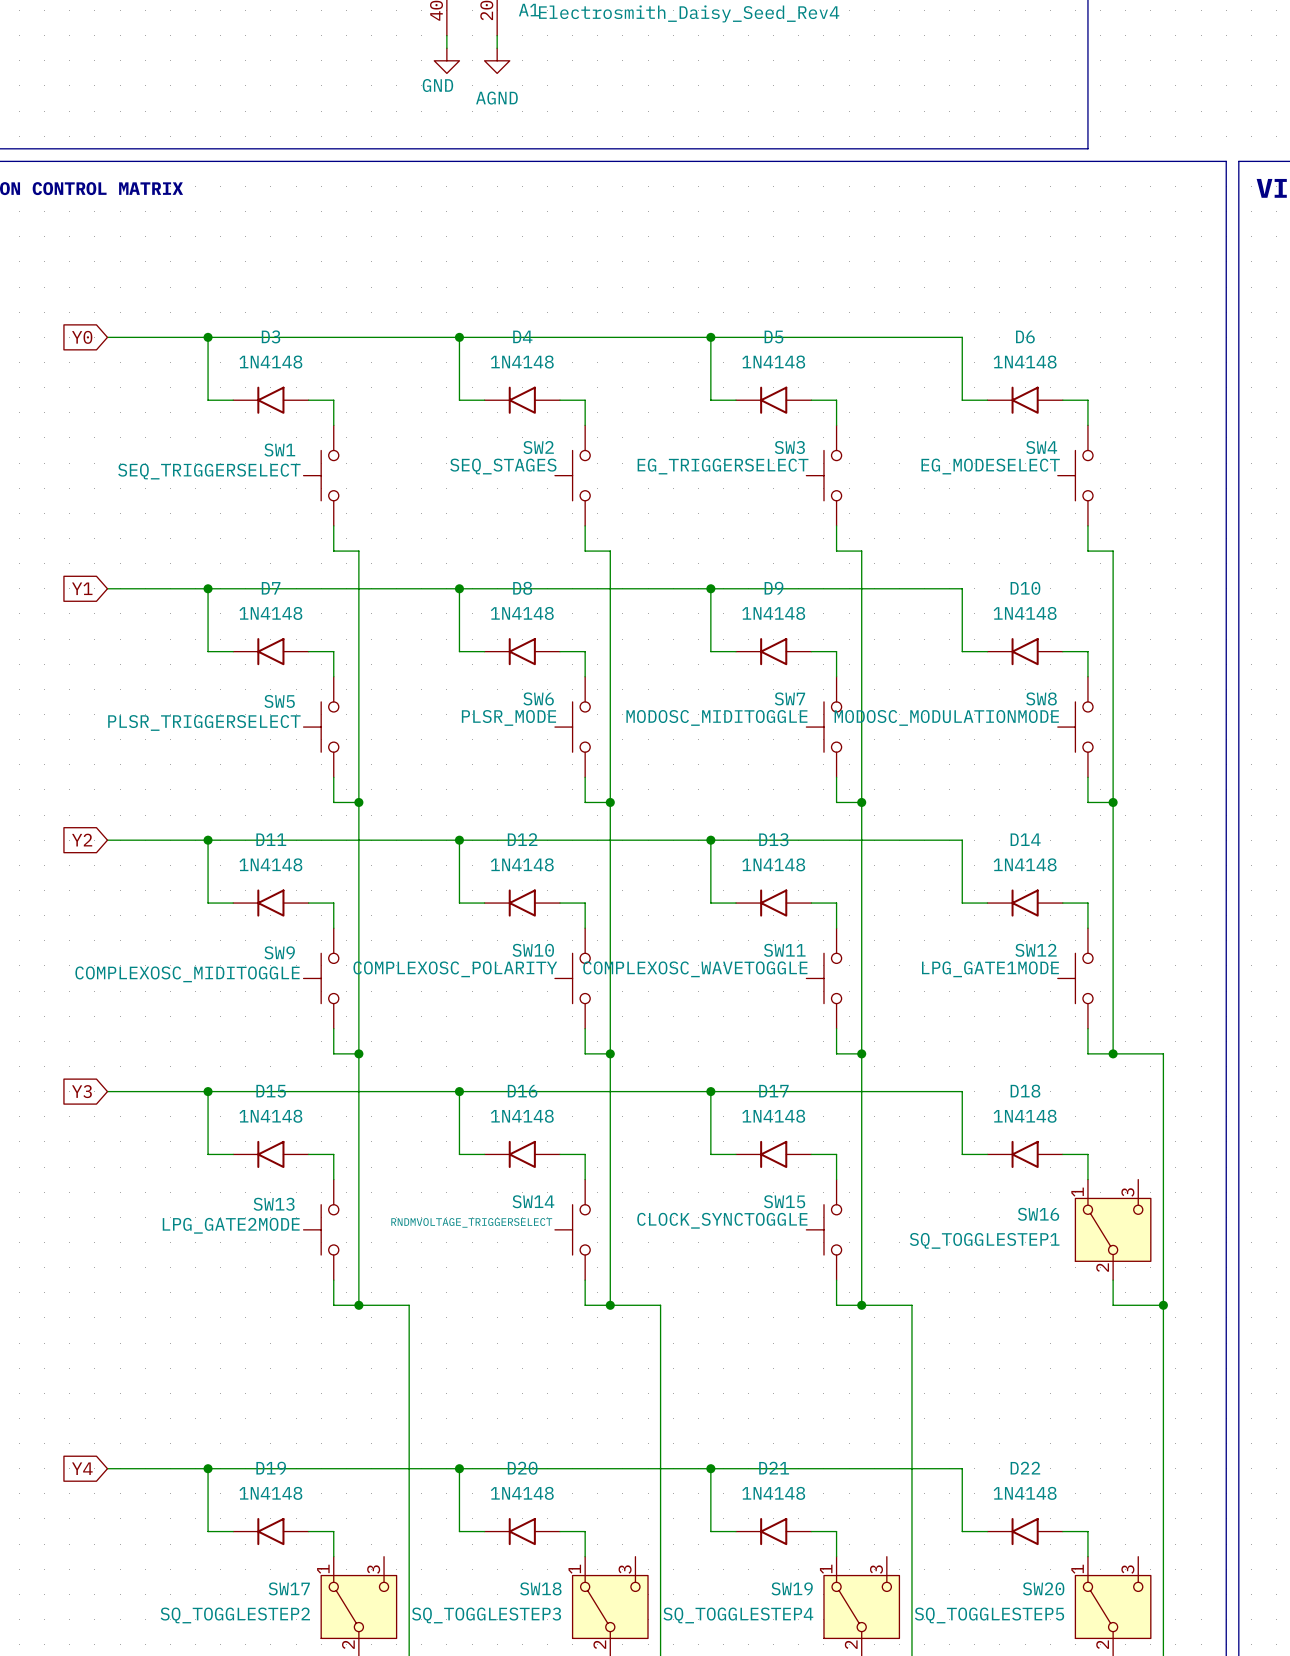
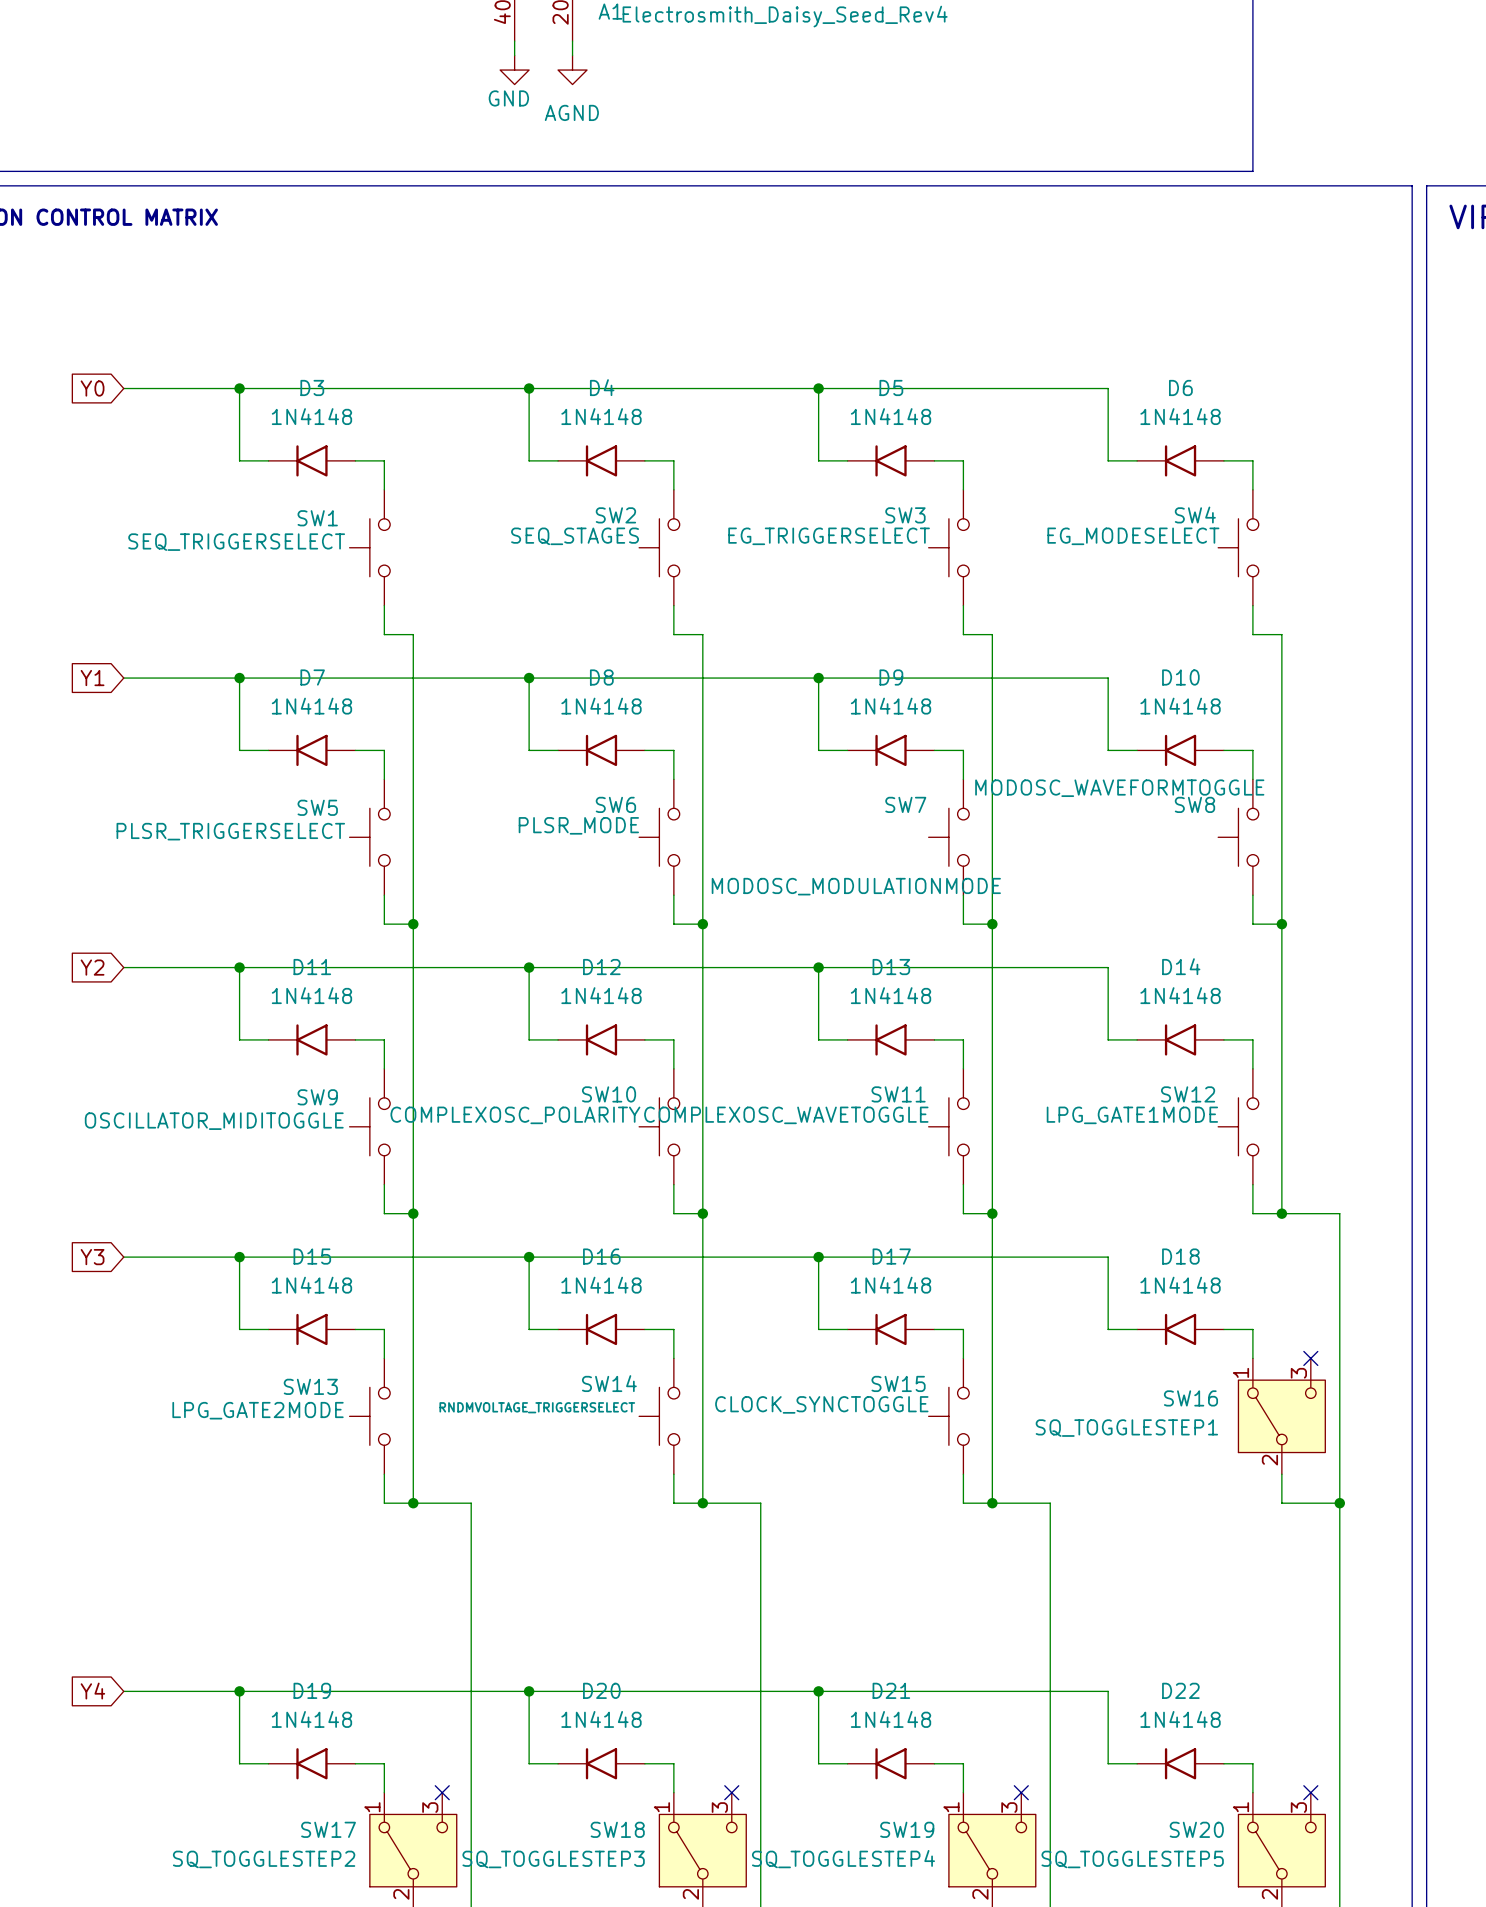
SW7 value: MODOSC_MIDITOGGLE (716, 717) -> MODOSC_MODULATIONMODE (856, 886)
SW8 value: MODOSC_MODULATIONMODE (946, 717) -> MODOSC_WAVEFORMTOGGLE (1119, 788)
SW9 value: COMPLEXOSC_MIDITOGGLE (187, 974) -> OSCILLATOR_MIDITOGGLE (214, 1121)
no-connect mark: none -> (1310, 1358)
no-connect mark: none -> (442, 1792)
no-connect mark: none -> (731, 1792)
no-connect mark: none -> (1021, 1792)
no-connect mark: none -> (1310, 1792)

